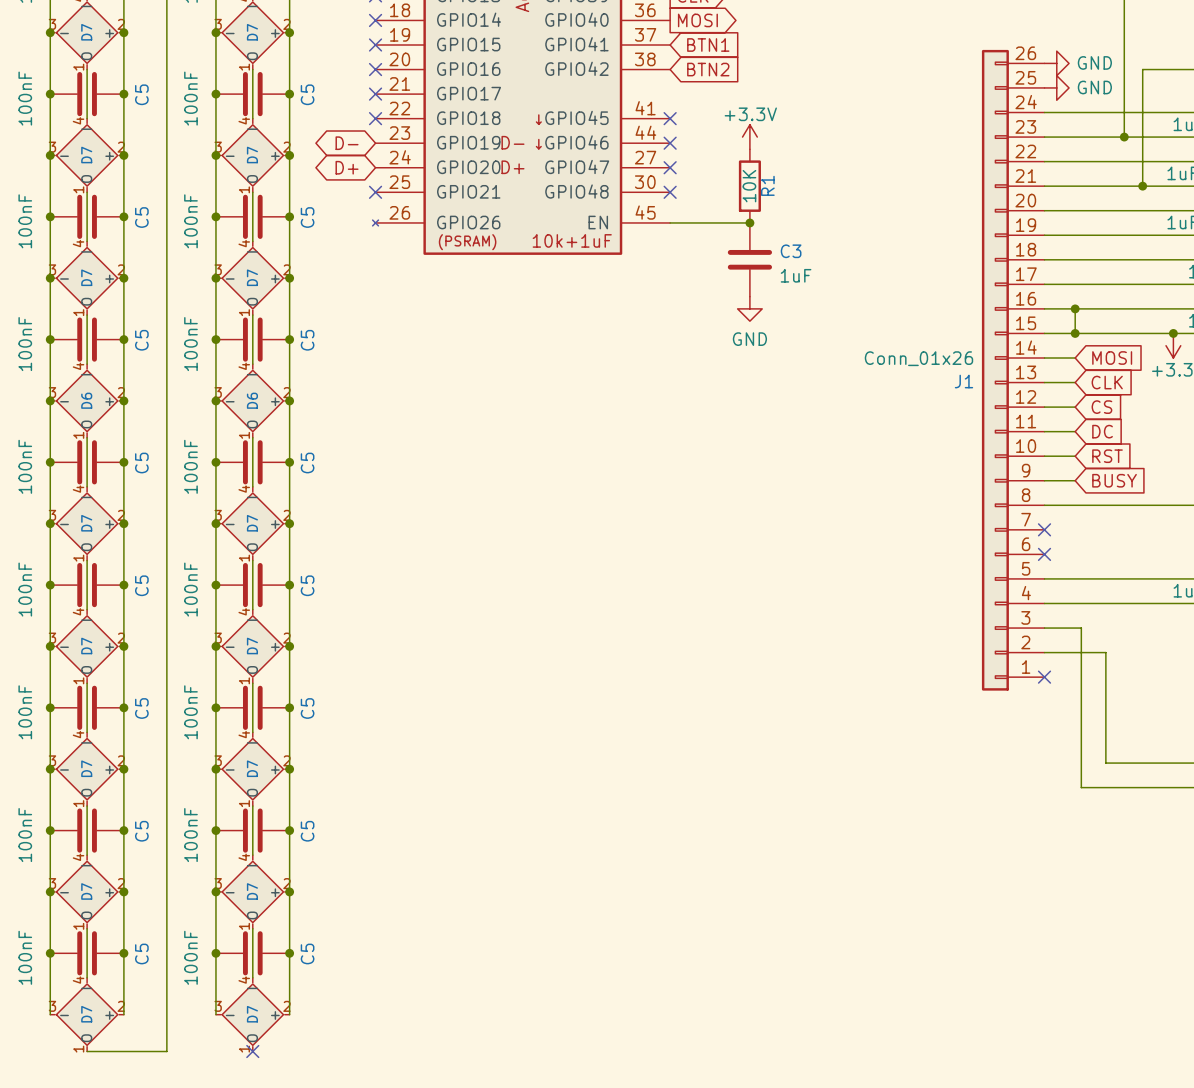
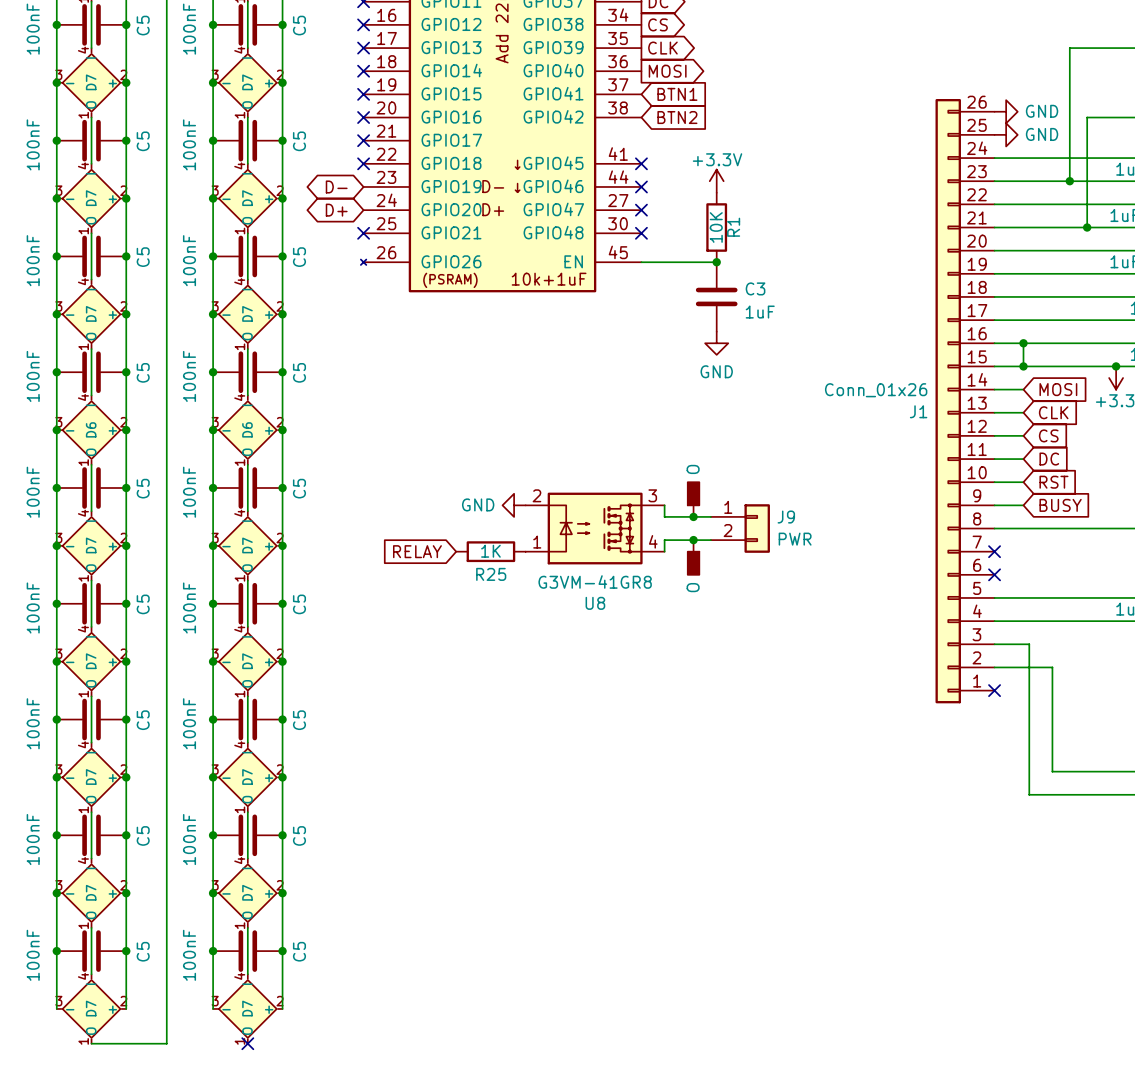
part: none -> O (693, 499)
power symbol: none -> GND (514, 505)
wire: none -> (664, 505) (664, 516) (710, 516)
junction: none -> (693, 516)
U8: none -> G3VM-41GR8 (595, 528)
J9: none -> PWR (740, 528)
junction: none -> (693, 540)
wire: none -> (710, 540) (664, 540) (664, 551)
global label: none -> RELAY (417, 551)
R25: none -> 1K (490, 551)
part: none -> O (693, 557)

